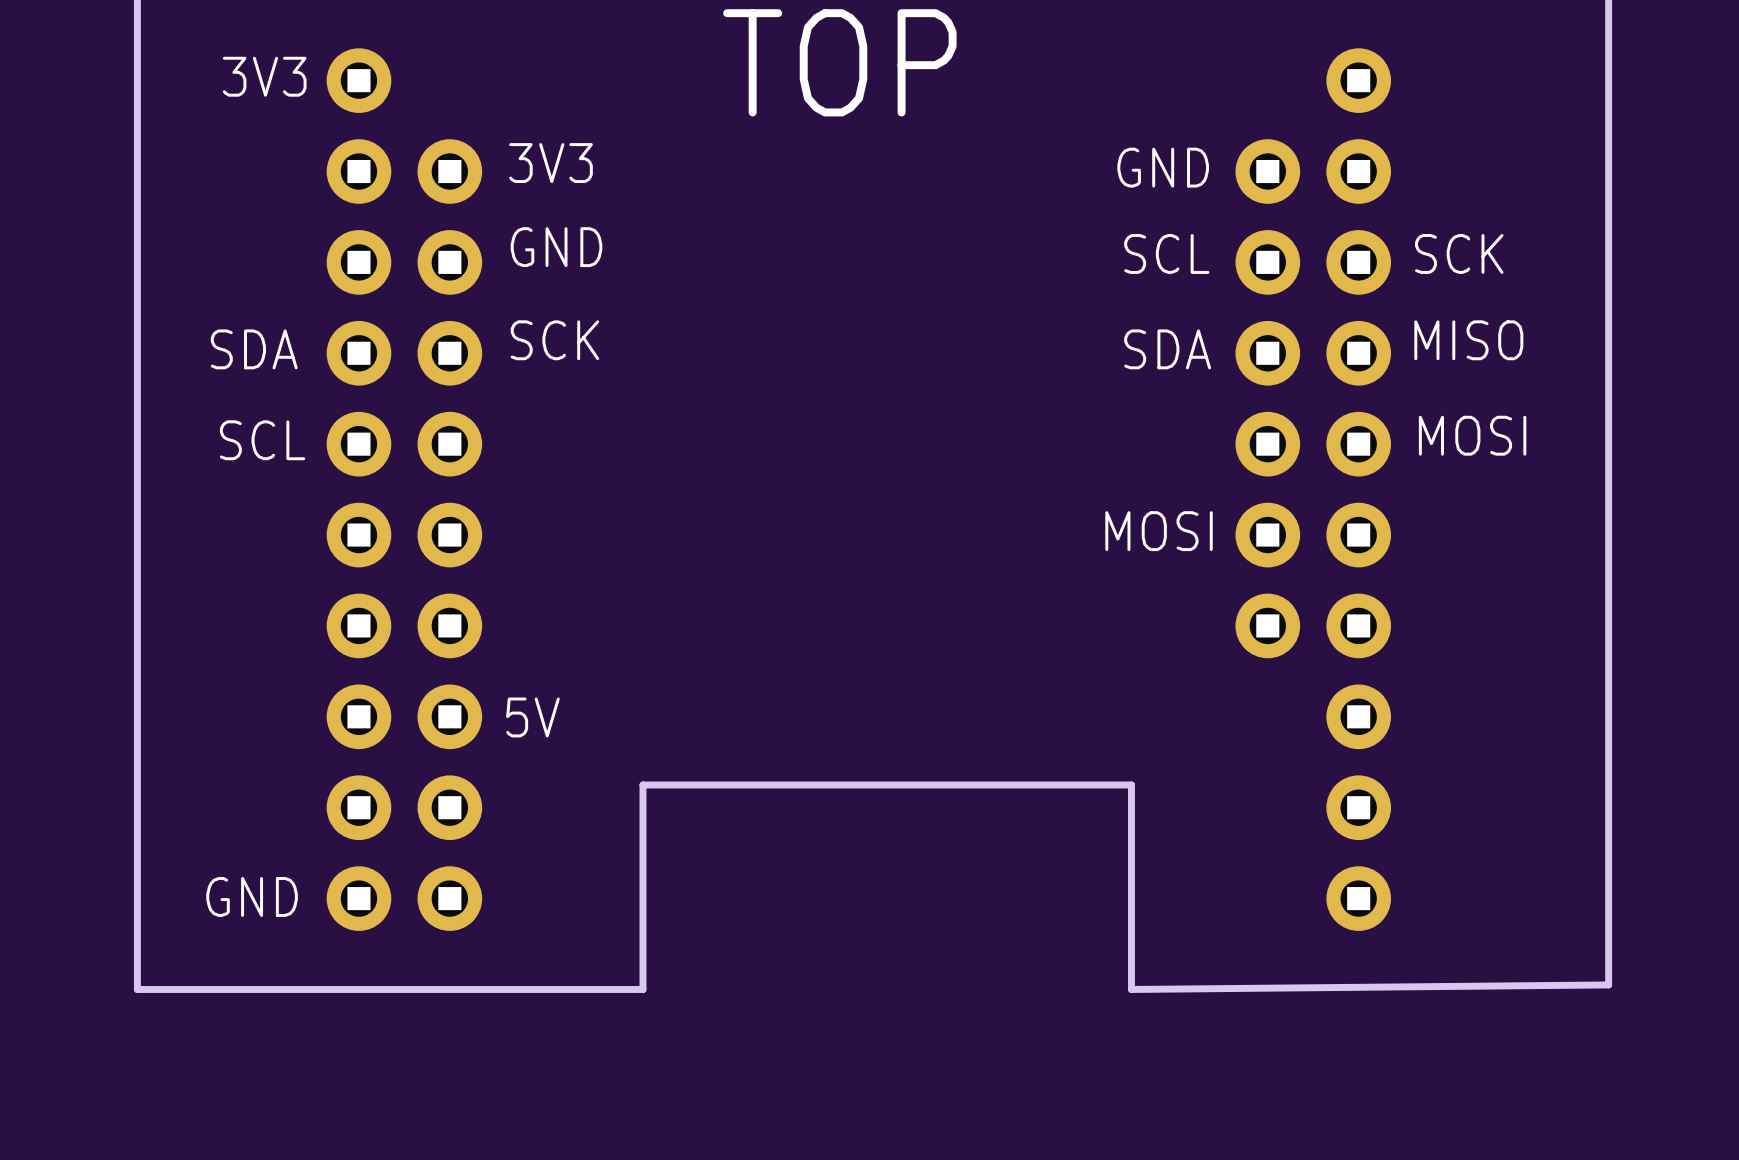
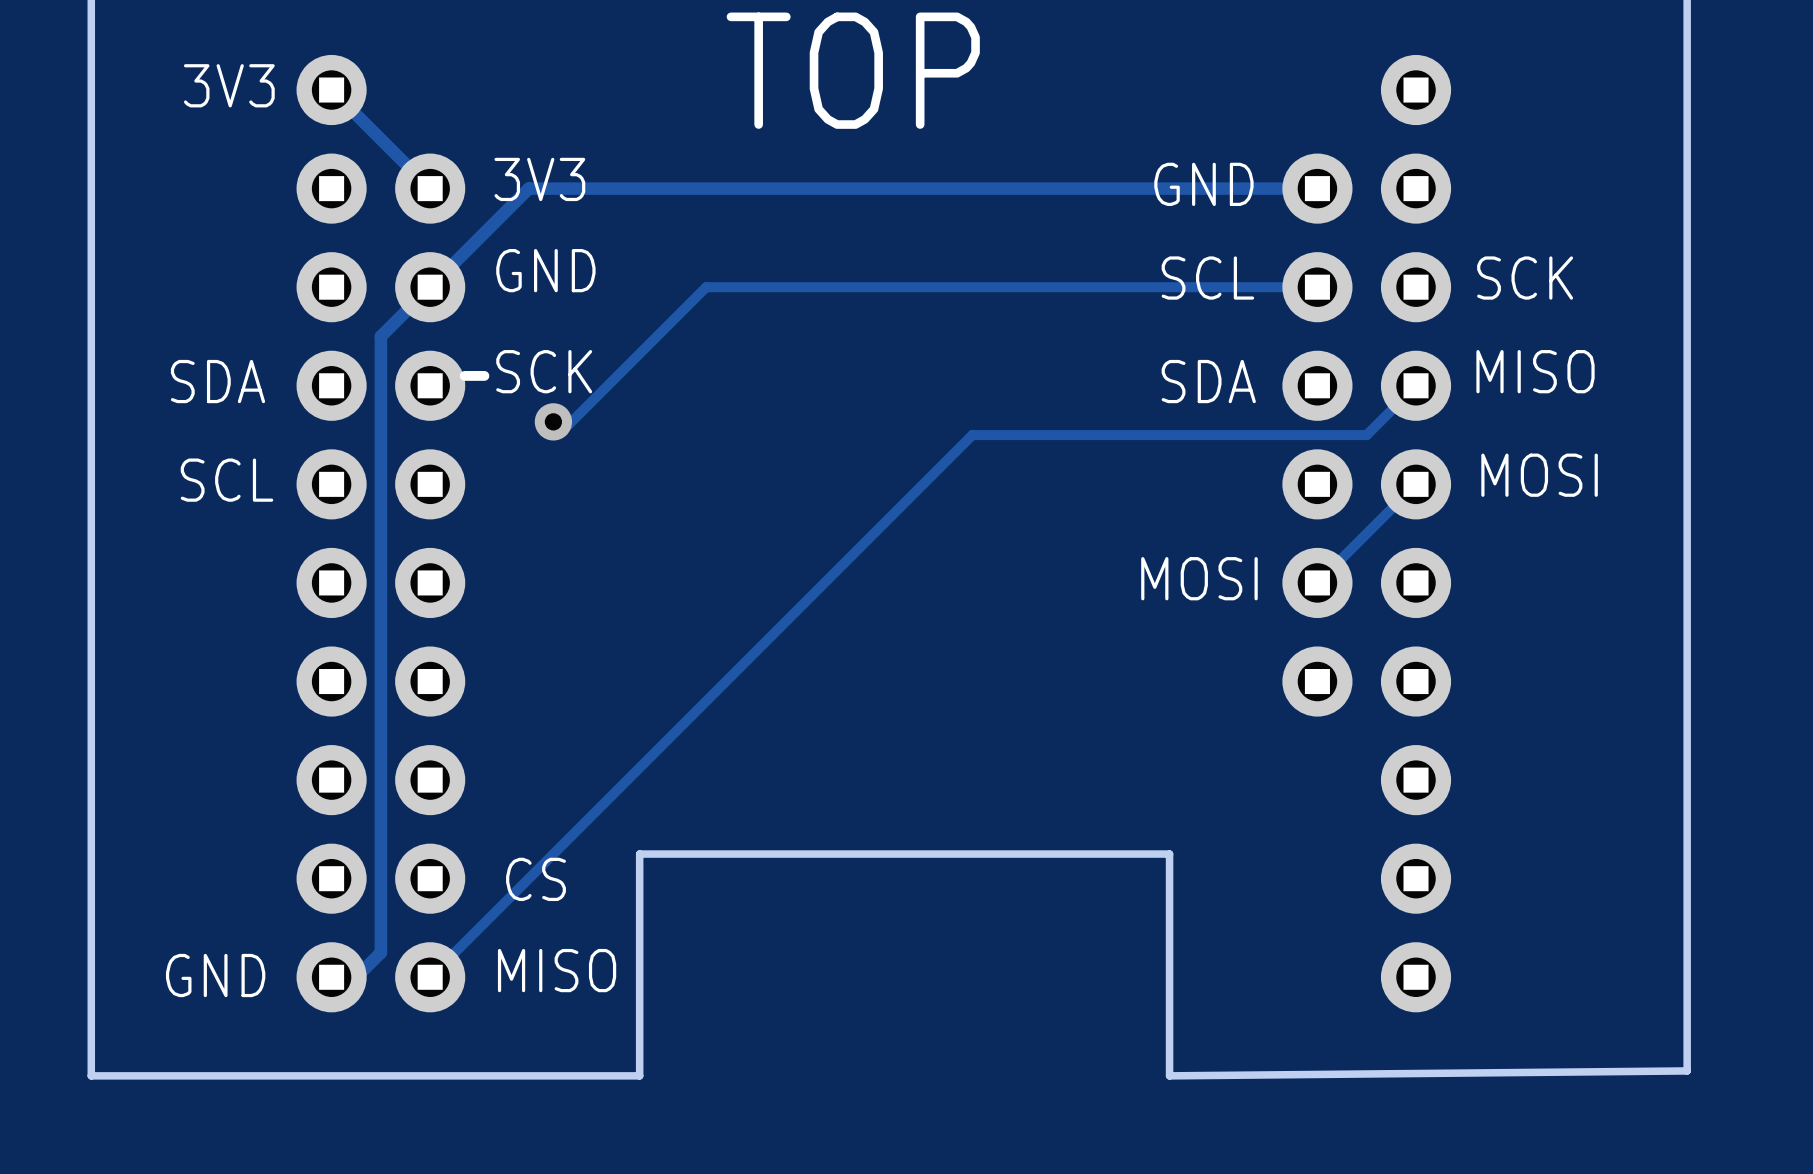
track: none -> (331, 90) (430, 188)
track: none -> (1317, 188) (528, 188) (380, 336) (380, 952) (356, 977) (331, 977)
track: none -> (1317, 287) (706, 287) (568, 425) (556, 425) (553, 421)
line: none -> (464, 375) (484, 375)
track: none -> (1416, 385) (1366, 435) (972, 435) (430, 977)
via: none -> (553, 421)
track: none -> (1416, 484) (1317, 582)
text: 5V (532, 717) -> none
text: none -> CS (536, 879)
text: none -> MISO (557, 970)

